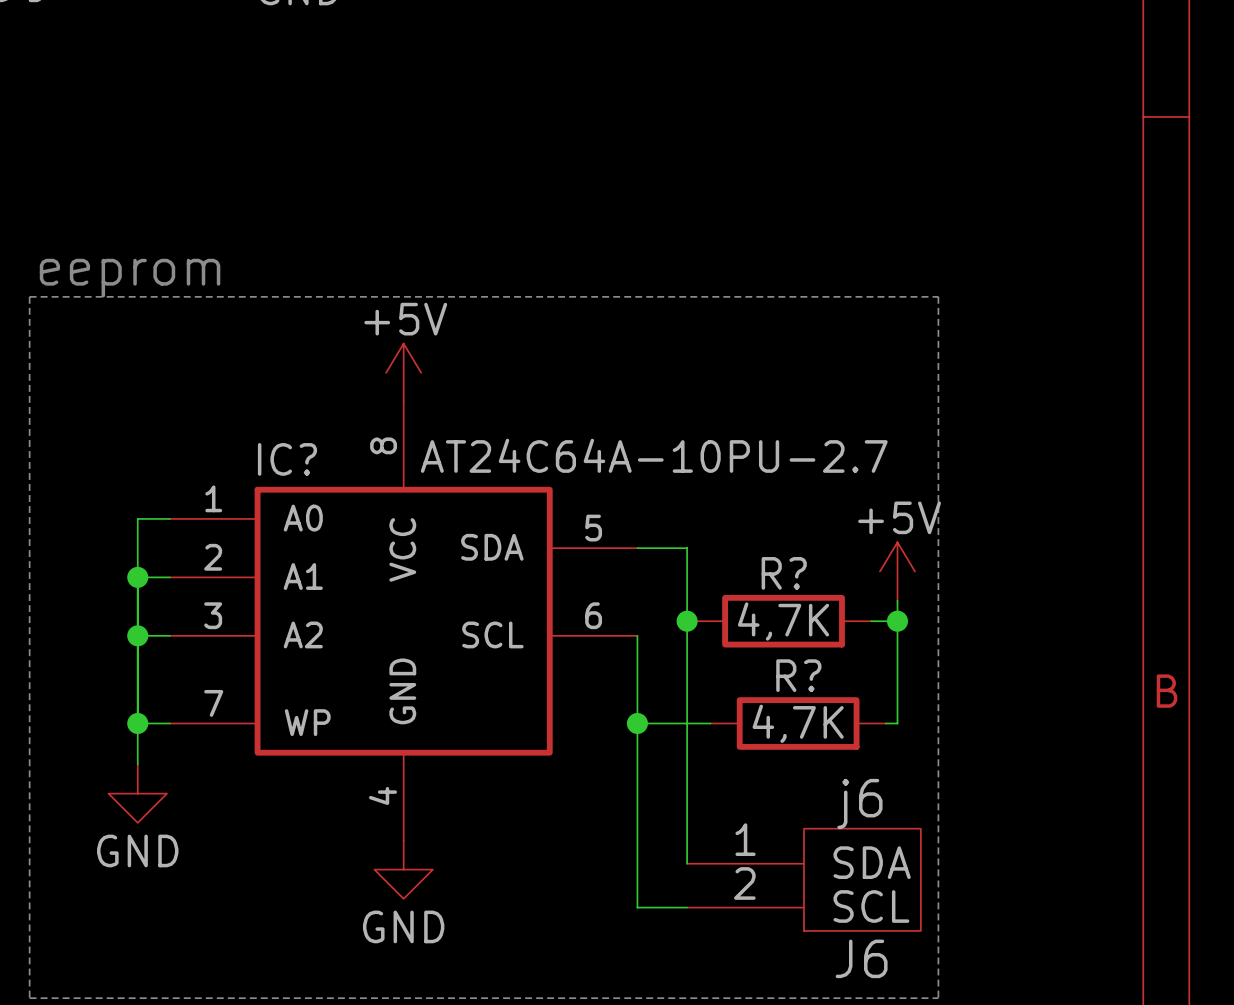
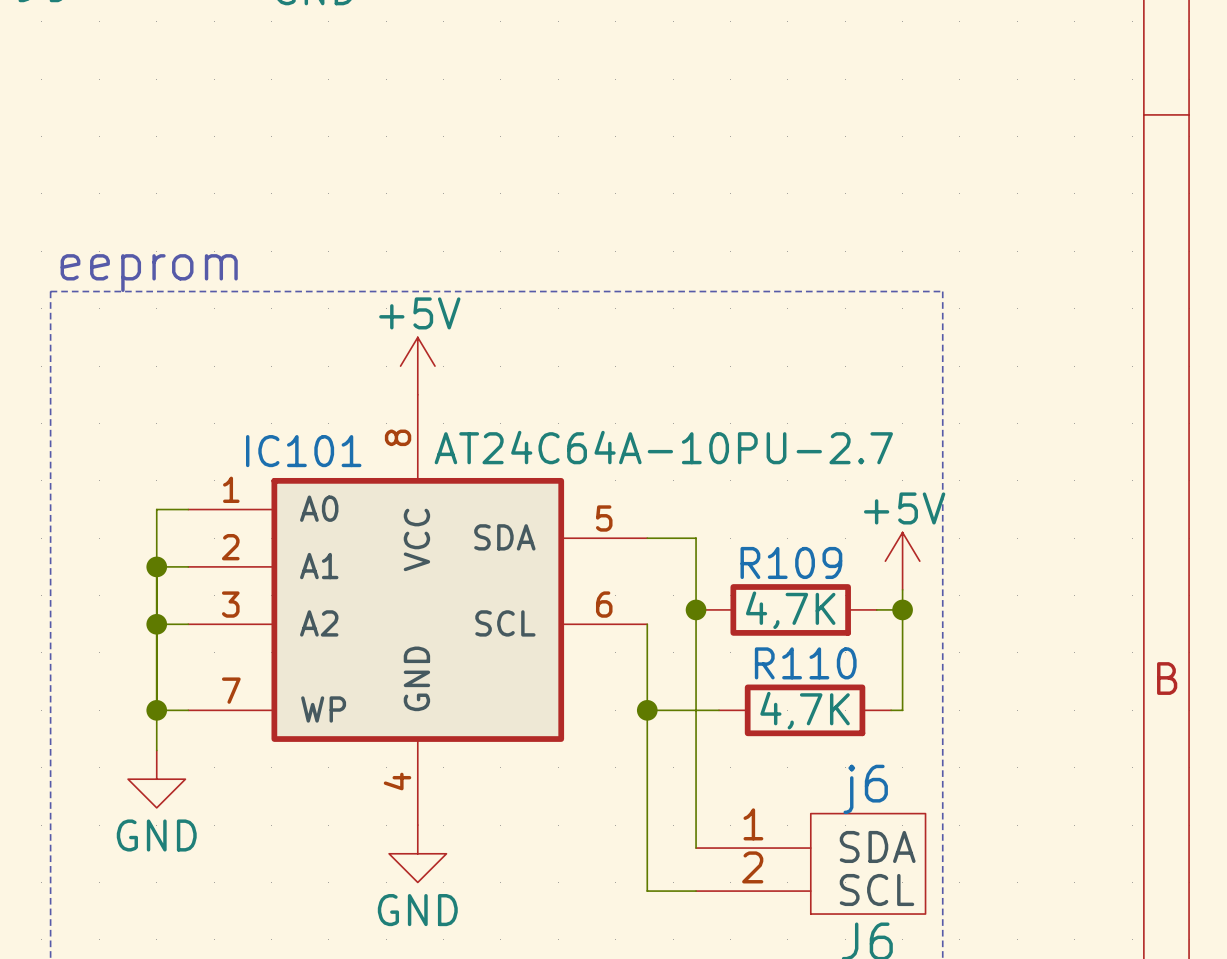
IC? name: IC? (287, 459) -> IC101 (303, 451)
R? name: R? (784, 573) -> R109 (791, 562)
R? name: R? (798, 675) -> R110 (805, 663)

